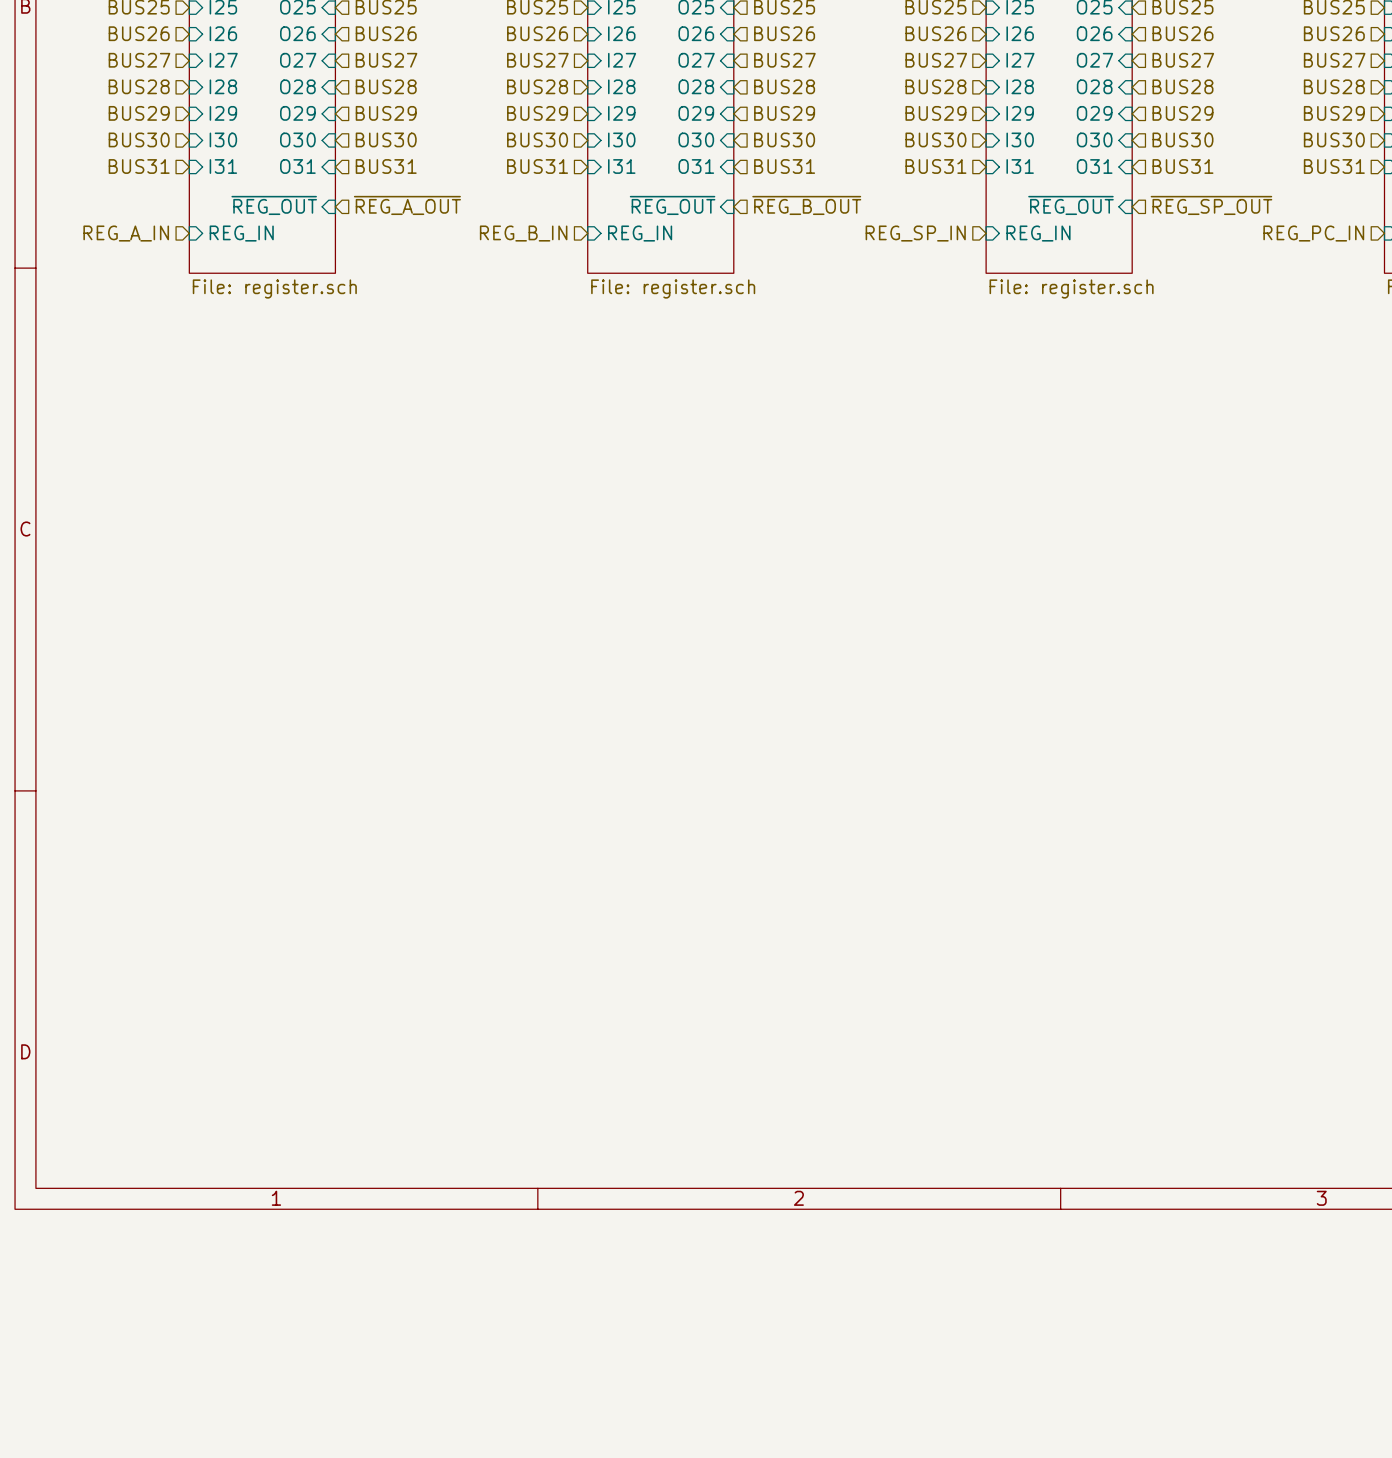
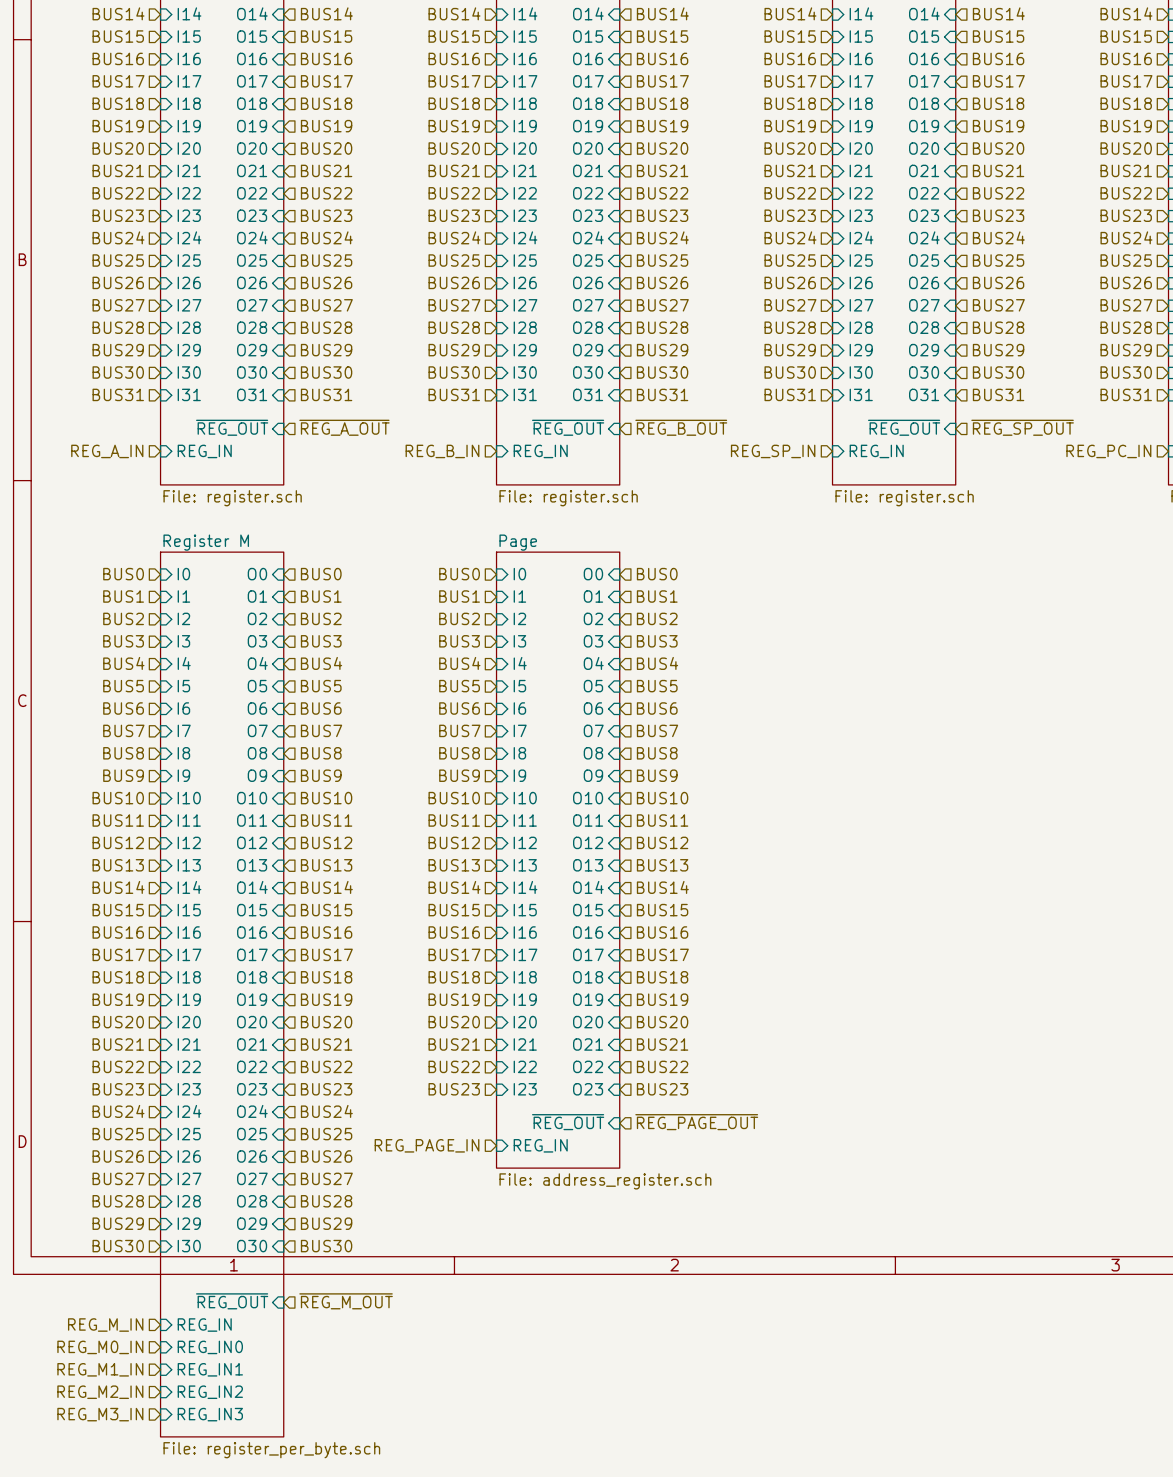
hierarchical label: none -> BUS0 (123, 574)
sheet pin: none -> I0 (183, 574)
sheet pin: none -> O0 (257, 574)
hierarchical label: none -> BUS0 (321, 574)
hierarchical label: none -> BUS0 (459, 574)
sheet pin: none -> I0 (519, 574)
sheet pin: none -> O0 (593, 574)
hierarchical label: none -> BUS0 (657, 574)
hierarchical label: none -> BUS1 (123, 596)
sheet pin: none -> I1 (183, 596)
sheet pin: none -> O1 (257, 596)
hierarchical label: none -> BUS1 (321, 596)
hierarchical label: none -> BUS1 (459, 596)
sheet pin: none -> I1 (519, 596)
sheet pin: none -> O1 (593, 596)
hierarchical label: none -> BUS1 (657, 596)
hierarchical label: none -> BUS2 (123, 618)
sheet pin: none -> I2 (183, 618)
sheet pin: none -> O2 (257, 618)
hierarchical label: none -> BUS2 (321, 618)
hierarchical label: none -> BUS2 (459, 618)
sheet pin: none -> I2 (519, 618)
sheet pin: none -> O2 (593, 618)
hierarchical label: none -> BUS2 (657, 618)
hierarchical label: none -> BUS3 (123, 641)
sheet pin: none -> I3 (183, 641)
sheet pin: none -> O3 (257, 641)
hierarchical label: none -> BUS3 (321, 641)
hierarchical label: none -> BUS3 (459, 641)
sheet pin: none -> I3 (519, 641)
sheet pin: none -> O3 (593, 641)
hierarchical label: none -> BUS3 (657, 641)
hierarchical label: none -> BUS4 (123, 663)
sheet pin: none -> I4 (184, 663)
sheet pin: none -> O4 (257, 663)
hierarchical label: none -> BUS4 (321, 663)
hierarchical label: none -> BUS4 (459, 663)
sheet pin: none -> I4 (520, 663)
sheet pin: none -> O4 (593, 663)
hierarchical label: none -> BUS4 (657, 663)
hierarchical label: none -> BUS5 (123, 686)
sheet pin: none -> I5 (183, 686)
sheet pin: none -> O5 (257, 686)
hierarchical label: none -> BUS5 (321, 686)
hierarchical label: none -> BUS5 (459, 686)
sheet pin: none -> I5 (519, 686)
sheet pin: none -> O5 (593, 686)
hierarchical label: none -> BUS5 (657, 686)
hierarchical label: none -> BUS6 (123, 708)
sheet pin: none -> I6 (183, 708)
sheet pin: none -> O6 (257, 708)
hierarchical label: none -> BUS6 (321, 708)
hierarchical label: none -> BUS6 (459, 708)
sheet pin: none -> I6 (519, 708)
sheet pin: none -> O6 (593, 708)
hierarchical label: none -> BUS6 (657, 708)
hierarchical label: none -> BUS7 (123, 730)
sheet pin: none -> I7 (184, 730)
sheet pin: none -> O7 (257, 730)
hierarchical label: none -> BUS7 (321, 730)
hierarchical label: none -> BUS7 (459, 730)
sheet pin: none -> I7 (520, 730)
sheet pin: none -> O7 (593, 730)
hierarchical label: none -> BUS7 (657, 730)
hierarchical label: none -> BUS8 (123, 753)
sheet pin: none -> I8 (183, 753)
sheet pin: none -> O8 (257, 753)
hierarchical label: none -> BUS8 (321, 753)
hierarchical label: none -> BUS8 (459, 753)
sheet pin: none -> I8 (519, 753)
sheet pin: none -> O8 (593, 753)
hierarchical label: none -> BUS8 (657, 753)
hierarchical label: none -> BUS9 (123, 775)
sheet pin: none -> I9 (183, 775)
sheet pin: none -> O9 (257, 775)
hierarchical label: none -> BUS9 (321, 775)
hierarchical label: none -> BUS9 (459, 775)
sheet pin: none -> I9 (519, 775)
sheet pin: none -> O9 (593, 775)
hierarchical label: none -> BUS9 (657, 775)
hierarchical label: none -> BUS10 (118, 798)
sheet pin: none -> I10 (189, 798)
sheet pin: none -> O10 (252, 798)
hierarchical label: none -> BUS10 (326, 798)
hierarchical label: none -> BUS10 (454, 798)
sheet pin: none -> I10 (525, 798)
sheet pin: none -> O10 (588, 798)
hierarchical label: none -> BUS10 (662, 798)
hierarchical label: none -> BUS11 (118, 820)
sheet pin: none -> I11 (189, 820)
sheet pin: none -> O11 (252, 820)
hierarchical label: none -> BUS11 (326, 820)
hierarchical label: none -> BUS11 (454, 820)
sheet pin: none -> I11 (525, 820)
sheet pin: none -> O11 (588, 820)
hierarchical label: none -> BUS11 (662, 820)
hierarchical label: none -> BUS12 (118, 842)
sheet pin: none -> I12 (189, 842)
sheet pin: none -> O12 (252, 842)
hierarchical label: none -> BUS12 (326, 842)
hierarchical label: none -> BUS12 (454, 842)
sheet pin: none -> I12 (525, 842)
sheet pin: none -> O12 (588, 842)
hierarchical label: none -> BUS12 (662, 842)
sheet Page: none -> File: address_register.sch (558, 860)
hierarchical label: none -> BUS13 (118, 865)
sheet pin: none -> I13 (189, 865)
sheet pin: none -> O13 (252, 865)
hierarchical label: none -> BUS13 (326, 865)
hierarchical label: none -> BUS13 (454, 865)
sheet pin: none -> I13 (525, 865)
sheet pin: none -> O13 (588, 865)
hierarchical label: none -> BUS13 (662, 865)
hierarchical label: none -> BUS14 (118, 887)
sheet pin: none -> I14 (189, 887)
sheet pin: none -> O14 (252, 887)
hierarchical label: none -> BUS14 (326, 887)
hierarchical label: none -> BUS14 (454, 887)
sheet pin: none -> I14 (525, 887)
sheet pin: none -> O14 (588, 887)
hierarchical label: none -> BUS14 (662, 887)
hierarchical label: none -> BUS15 (118, 910)
sheet pin: none -> I15 (189, 910)
sheet pin: none -> O15 (252, 910)
hierarchical label: none -> BUS15 (326, 910)
hierarchical label: none -> BUS15 (454, 910)
sheet pin: none -> I15 (525, 910)
sheet pin: none -> O15 (588, 910)
hierarchical label: none -> BUS15 (662, 910)
hierarchical label: none -> BUS16 (118, 932)
sheet pin: none -> I16 (189, 932)
sheet pin: none -> O16 (252, 932)
hierarchical label: none -> BUS16 (326, 932)
hierarchical label: none -> BUS16 (454, 932)
sheet pin: none -> I16 (525, 932)
sheet pin: none -> O16 (588, 932)
hierarchical label: none -> BUS16 (662, 932)
hierarchical label: none -> BUS17 (118, 954)
sheet pin: none -> I17 (189, 954)
sheet pin: none -> O17 (252, 954)
hierarchical label: none -> BUS17 (326, 954)
hierarchical label: none -> BUS17 (454, 954)
sheet pin: none -> I17 (525, 954)
sheet pin: none -> O17 (588, 954)
hierarchical label: none -> BUS17 (662, 954)
hierarchical label: none -> BUS18 (118, 977)
sheet pin: none -> I18 (189, 977)
sheet pin: none -> O18 (252, 977)
hierarchical label: none -> BUS18 (326, 977)
hierarchical label: none -> BUS18 (454, 977)
sheet pin: none -> I18 (525, 977)
sheet pin: none -> O18 (588, 977)
hierarchical label: none -> BUS18 (662, 977)
sheet Register M: none -> File: register_per_byte.sch (222, 994)
hierarchical label: none -> BUS19 (118, 999)
sheet pin: none -> I19 (189, 999)
sheet pin: none -> O19 (252, 999)
hierarchical label: none -> BUS19 (326, 999)
hierarchical label: none -> BUS19 (454, 999)
sheet pin: none -> I19 (525, 999)
sheet pin: none -> O19 (588, 999)
hierarchical label: none -> BUS19 (662, 999)
hierarchical label: none -> BUS20 (118, 1022)
sheet pin: none -> I20 (189, 1022)
sheet pin: none -> O20 (252, 1022)
hierarchical label: none -> BUS20 (326, 1022)
hierarchical label: none -> BUS20 (454, 1022)
sheet pin: none -> I20 (525, 1022)
sheet pin: none -> O20 (588, 1022)
hierarchical label: none -> BUS20 (662, 1022)
hierarchical label: none -> BUS21 (118, 1044)
sheet pin: none -> I21 (189, 1044)
sheet pin: none -> O21 (252, 1044)
hierarchical label: none -> BUS21 (326, 1044)
hierarchical label: none -> BUS21 (454, 1044)
sheet pin: none -> I21 (525, 1044)
sheet pin: none -> O21 (588, 1044)
hierarchical label: none -> BUS21 (662, 1044)
hierarchical label: none -> BUS22 (118, 1066)
sheet pin: none -> I22 (189, 1066)
sheet pin: none -> O22 (252, 1066)
hierarchical label: none -> BUS22 (326, 1066)
hierarchical label: none -> BUS22 (454, 1066)
sheet pin: none -> I22 (525, 1066)
sheet pin: none -> O22 (588, 1066)
hierarchical label: none -> BUS22 (662, 1066)
hierarchical label: none -> BUS23 (118, 1089)
sheet pin: none -> I23 (189, 1089)
sheet pin: none -> O23 (252, 1089)
hierarchical label: none -> BUS23 (326, 1089)
hierarchical label: none -> BUS23 (454, 1089)
sheet pin: none -> I23 (525, 1089)
sheet pin: none -> O23 (588, 1089)
hierarchical label: none -> BUS23 (662, 1089)
hierarchical label: none -> BUS24 (118, 1111)
sheet pin: none -> I24 (189, 1111)
sheet pin: none -> O24 (252, 1111)
hierarchical label: none -> BUS24 (326, 1111)
sheet pin: none -> ~{REG_OUT} (568, 1122)
hierarchical label: none -> ~{REG_PAGE_OUT} (696, 1122)
hierarchical label: none -> BUS25 (118, 1134)
sheet pin: none -> I25 (189, 1134)
sheet pin: none -> O25 (252, 1134)
hierarchical label: none -> BUS25 (326, 1134)
hierarchical label: none -> REG_PAGE_IN (427, 1145)
sheet pin: none -> REG_IN (540, 1145)
hierarchical label: none -> BUS26 (118, 1156)
sheet pin: none -> I26 (189, 1156)
sheet pin: none -> O26 (252, 1156)
hierarchical label: none -> BUS26 (326, 1156)
hierarchical label: none -> BUS27 (118, 1178)
sheet pin: none -> I27 (189, 1178)
sheet pin: none -> O27 (252, 1178)
hierarchical label: none -> BUS27 (326, 1178)
hierarchical label: none -> BUS28 (118, 1201)
sheet pin: none -> I28 (189, 1201)
sheet pin: none -> O28 (252, 1201)
hierarchical label: none -> BUS28 (326, 1201)
hierarchical label: none -> BUS29 (118, 1223)
sheet pin: none -> I29 (189, 1223)
sheet pin: none -> O29 (252, 1223)
hierarchical label: none -> BUS29 (326, 1223)
hierarchical label: none -> BUS30 (118, 1246)
sheet pin: none -> I30 (189, 1246)
sheet pin: none -> O30 (252, 1246)
hierarchical label: none -> BUS30 (326, 1246)
sheet pin: none -> ~{REG_OUT} (232, 1301)
hierarchical label: none -> ~{REG_M_OUT} (346, 1301)
hierarchical label: none -> REG_M_IN (105, 1325)
sheet pin: none -> REG_IN (204, 1325)
hierarchical label: none -> REG_M0_IN (100, 1347)
sheet pin: none -> REG_IN0 (210, 1347)
hierarchical label: none -> REG_M1_IN (100, 1369)
sheet pin: none -> REG_IN1 (210, 1369)
hierarchical label: none -> REG_M2_IN (100, 1392)
sheet pin: none -> REG_IN2 (210, 1392)
hierarchical label: none -> REG_M3_IN (100, 1414)
sheet pin: none -> REG_IN3 (210, 1414)

